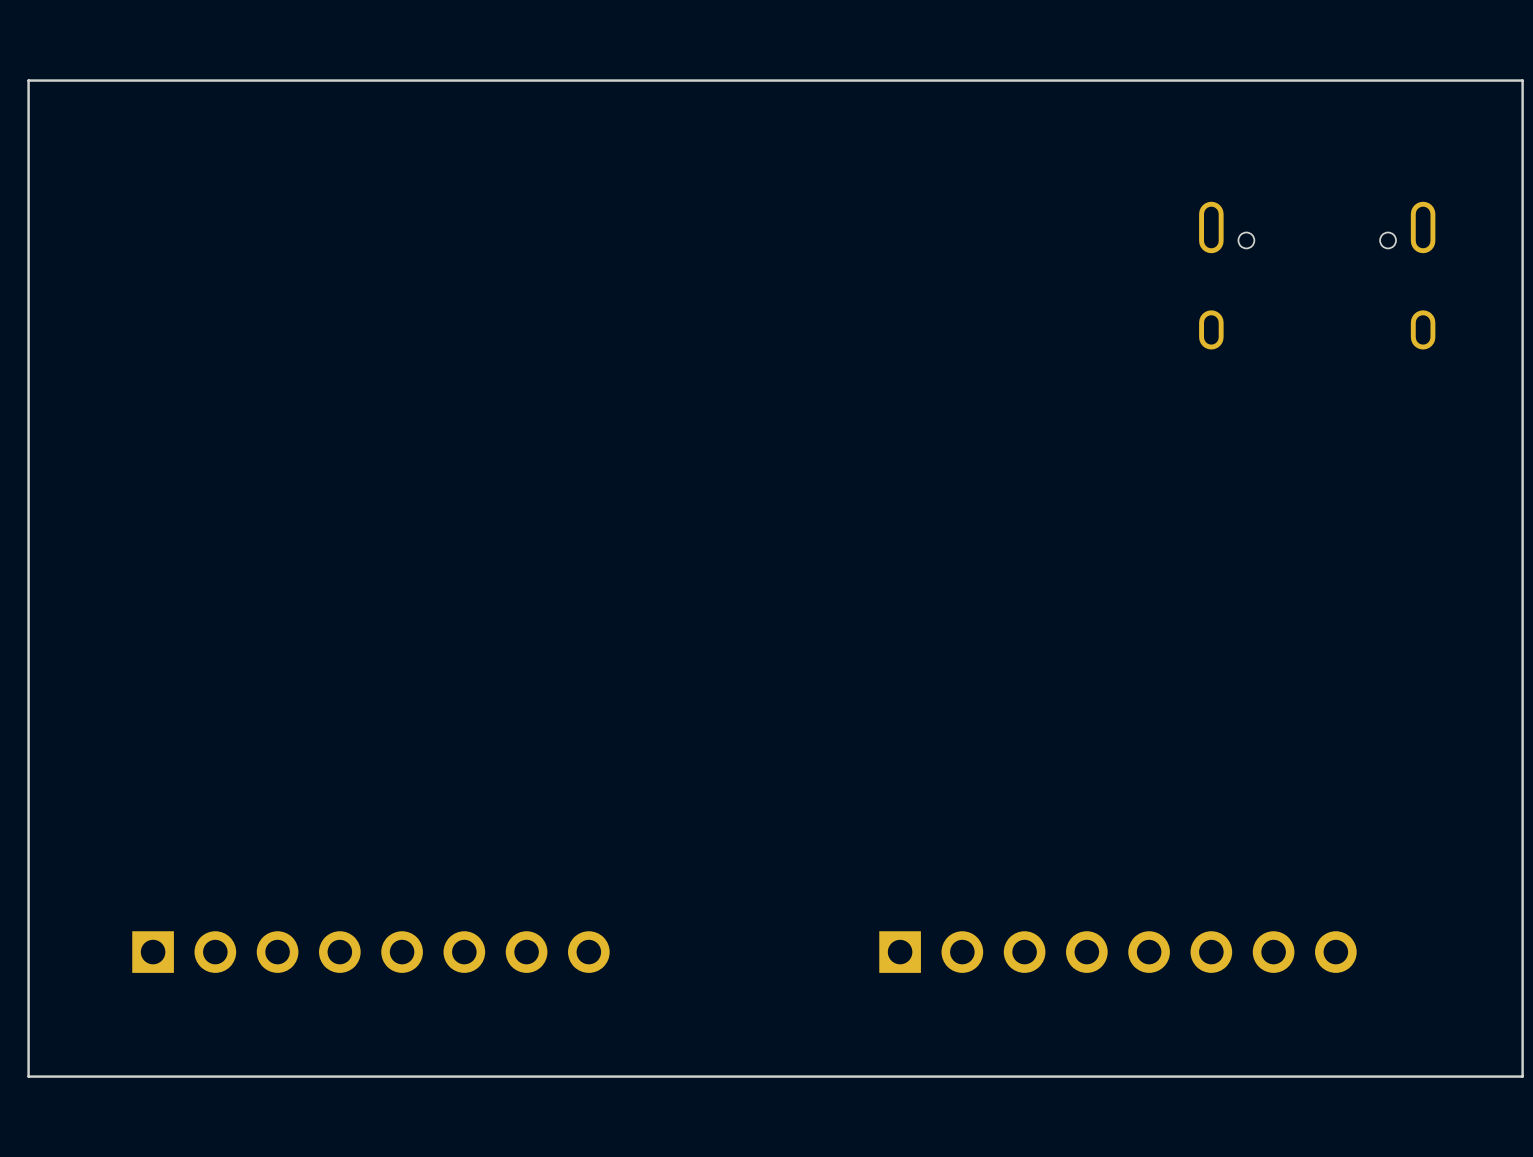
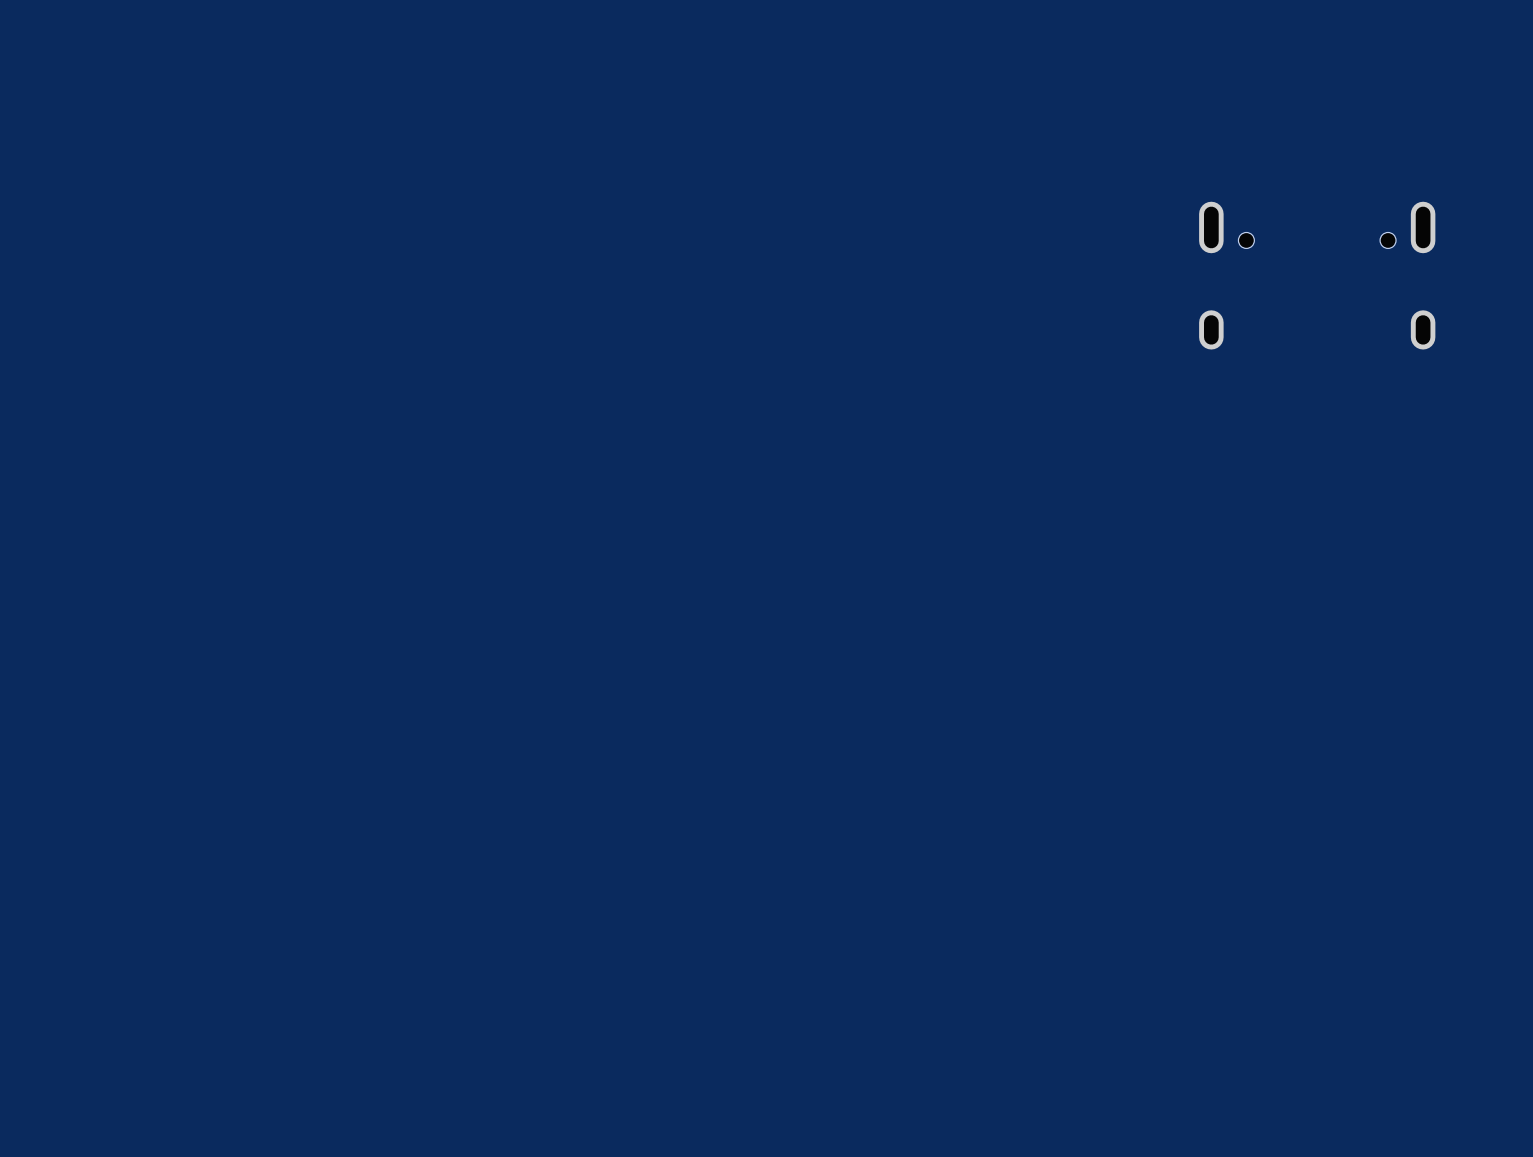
board edge: (1522, 80) (28, 80) (28, 1076) (1522, 1076) (1522, 80) -> none
part: (370, 952) -> none
part: (1117, 952) -> none

